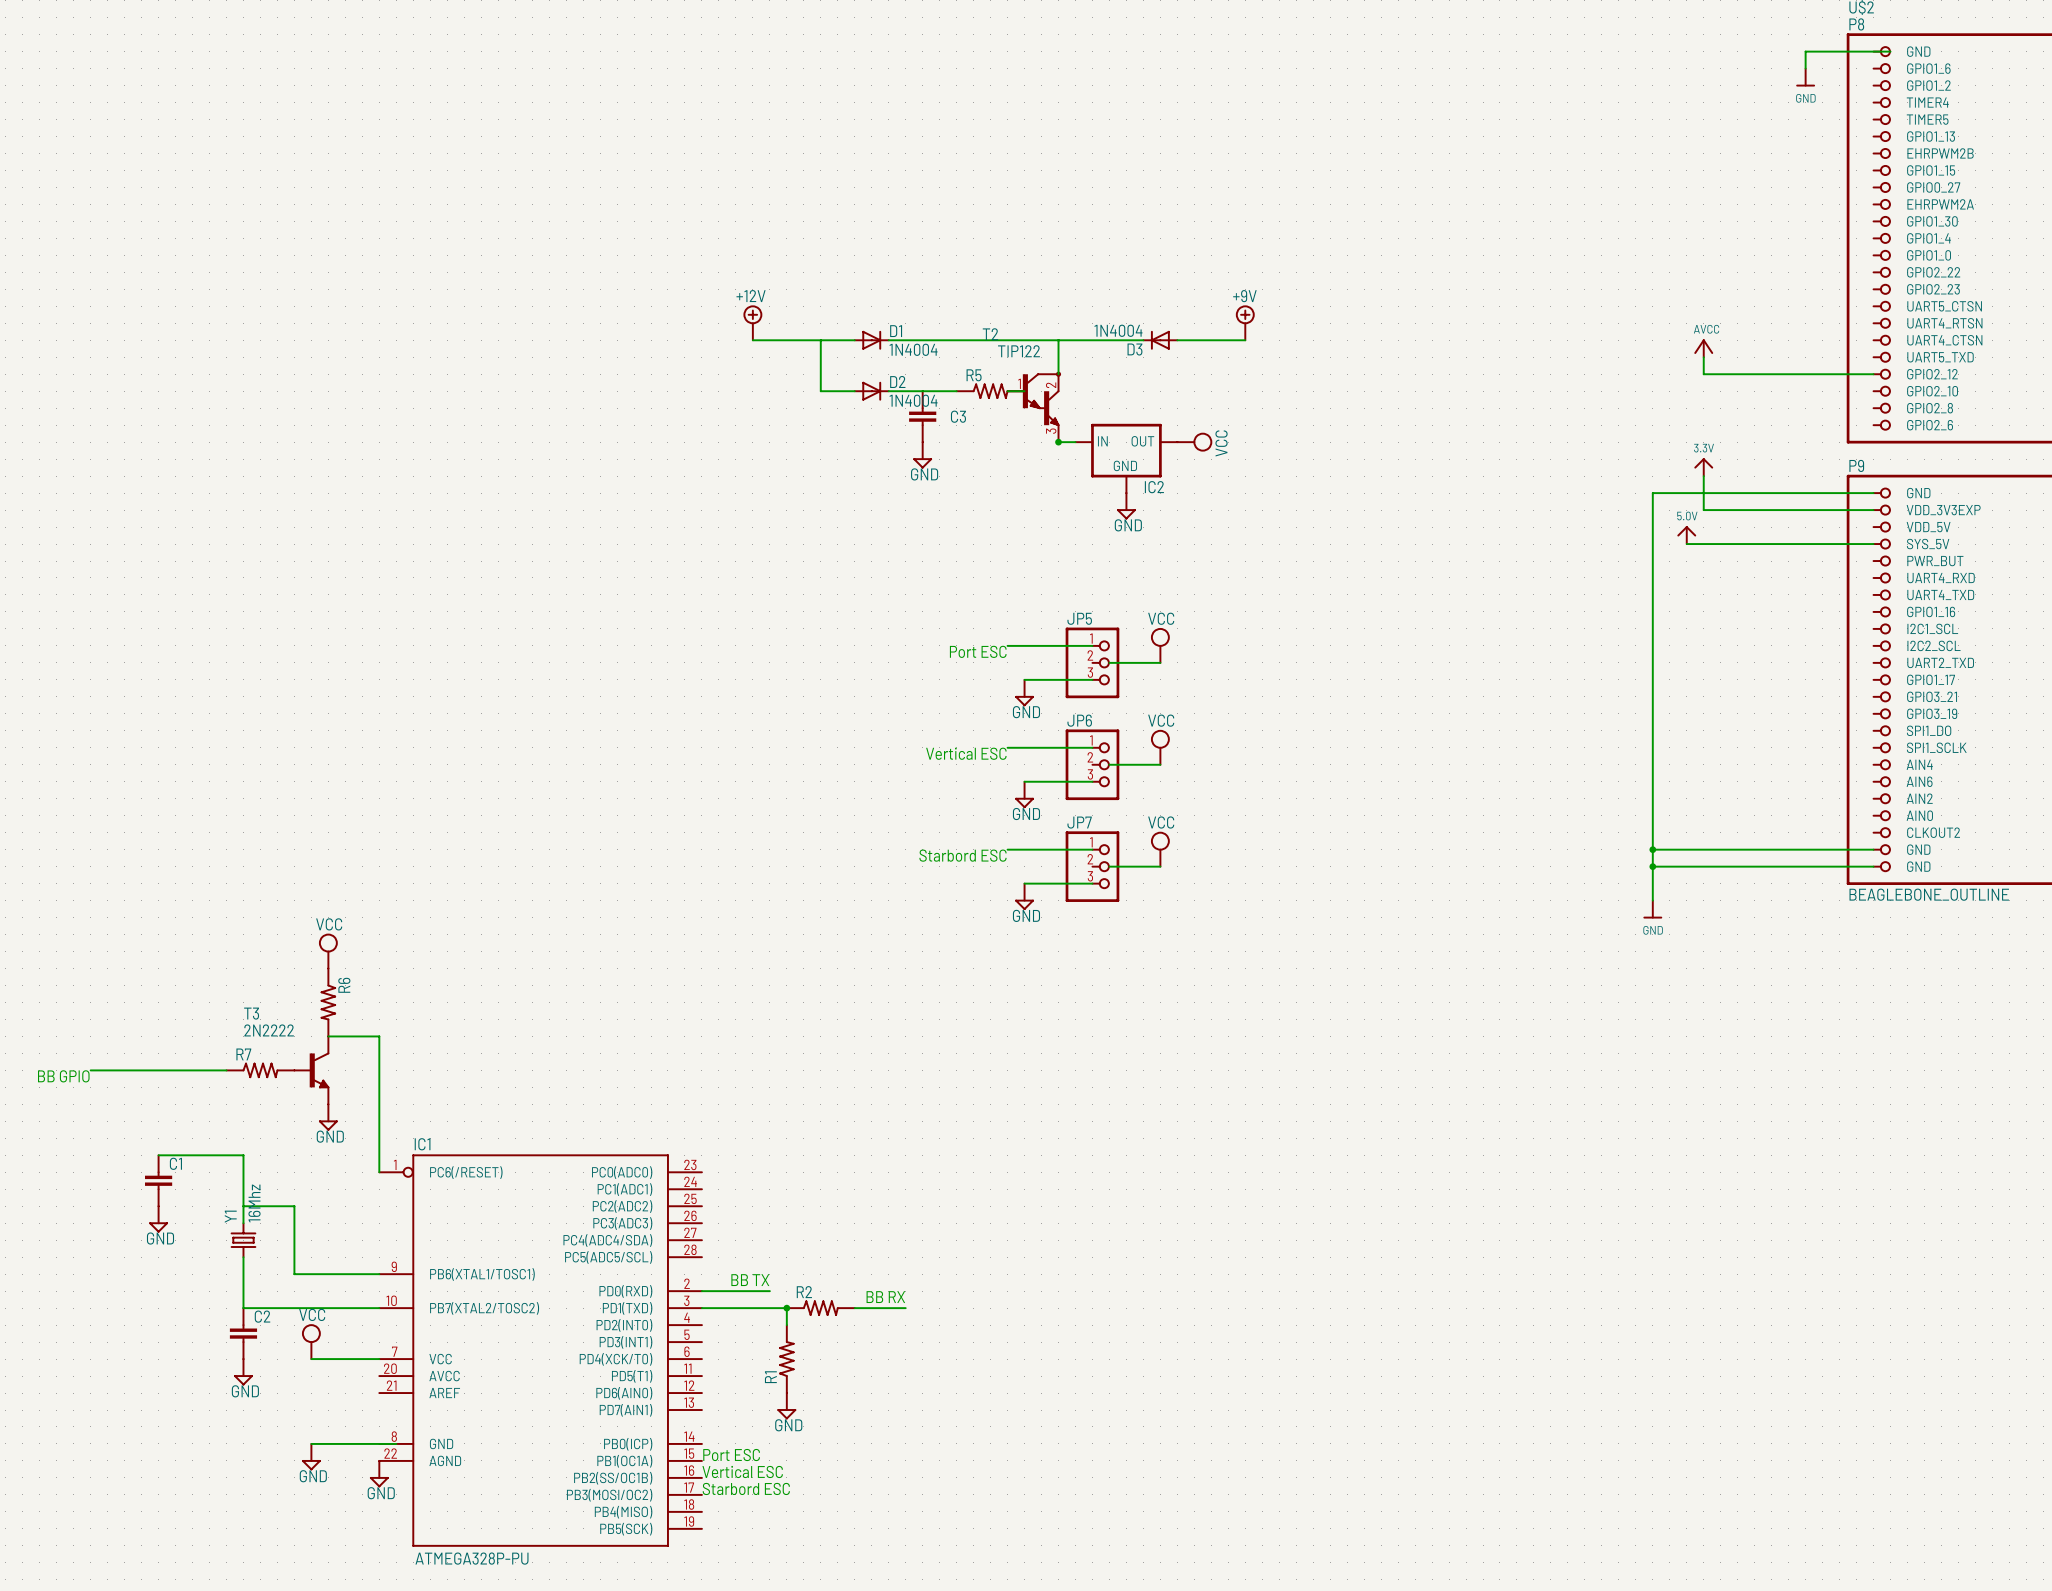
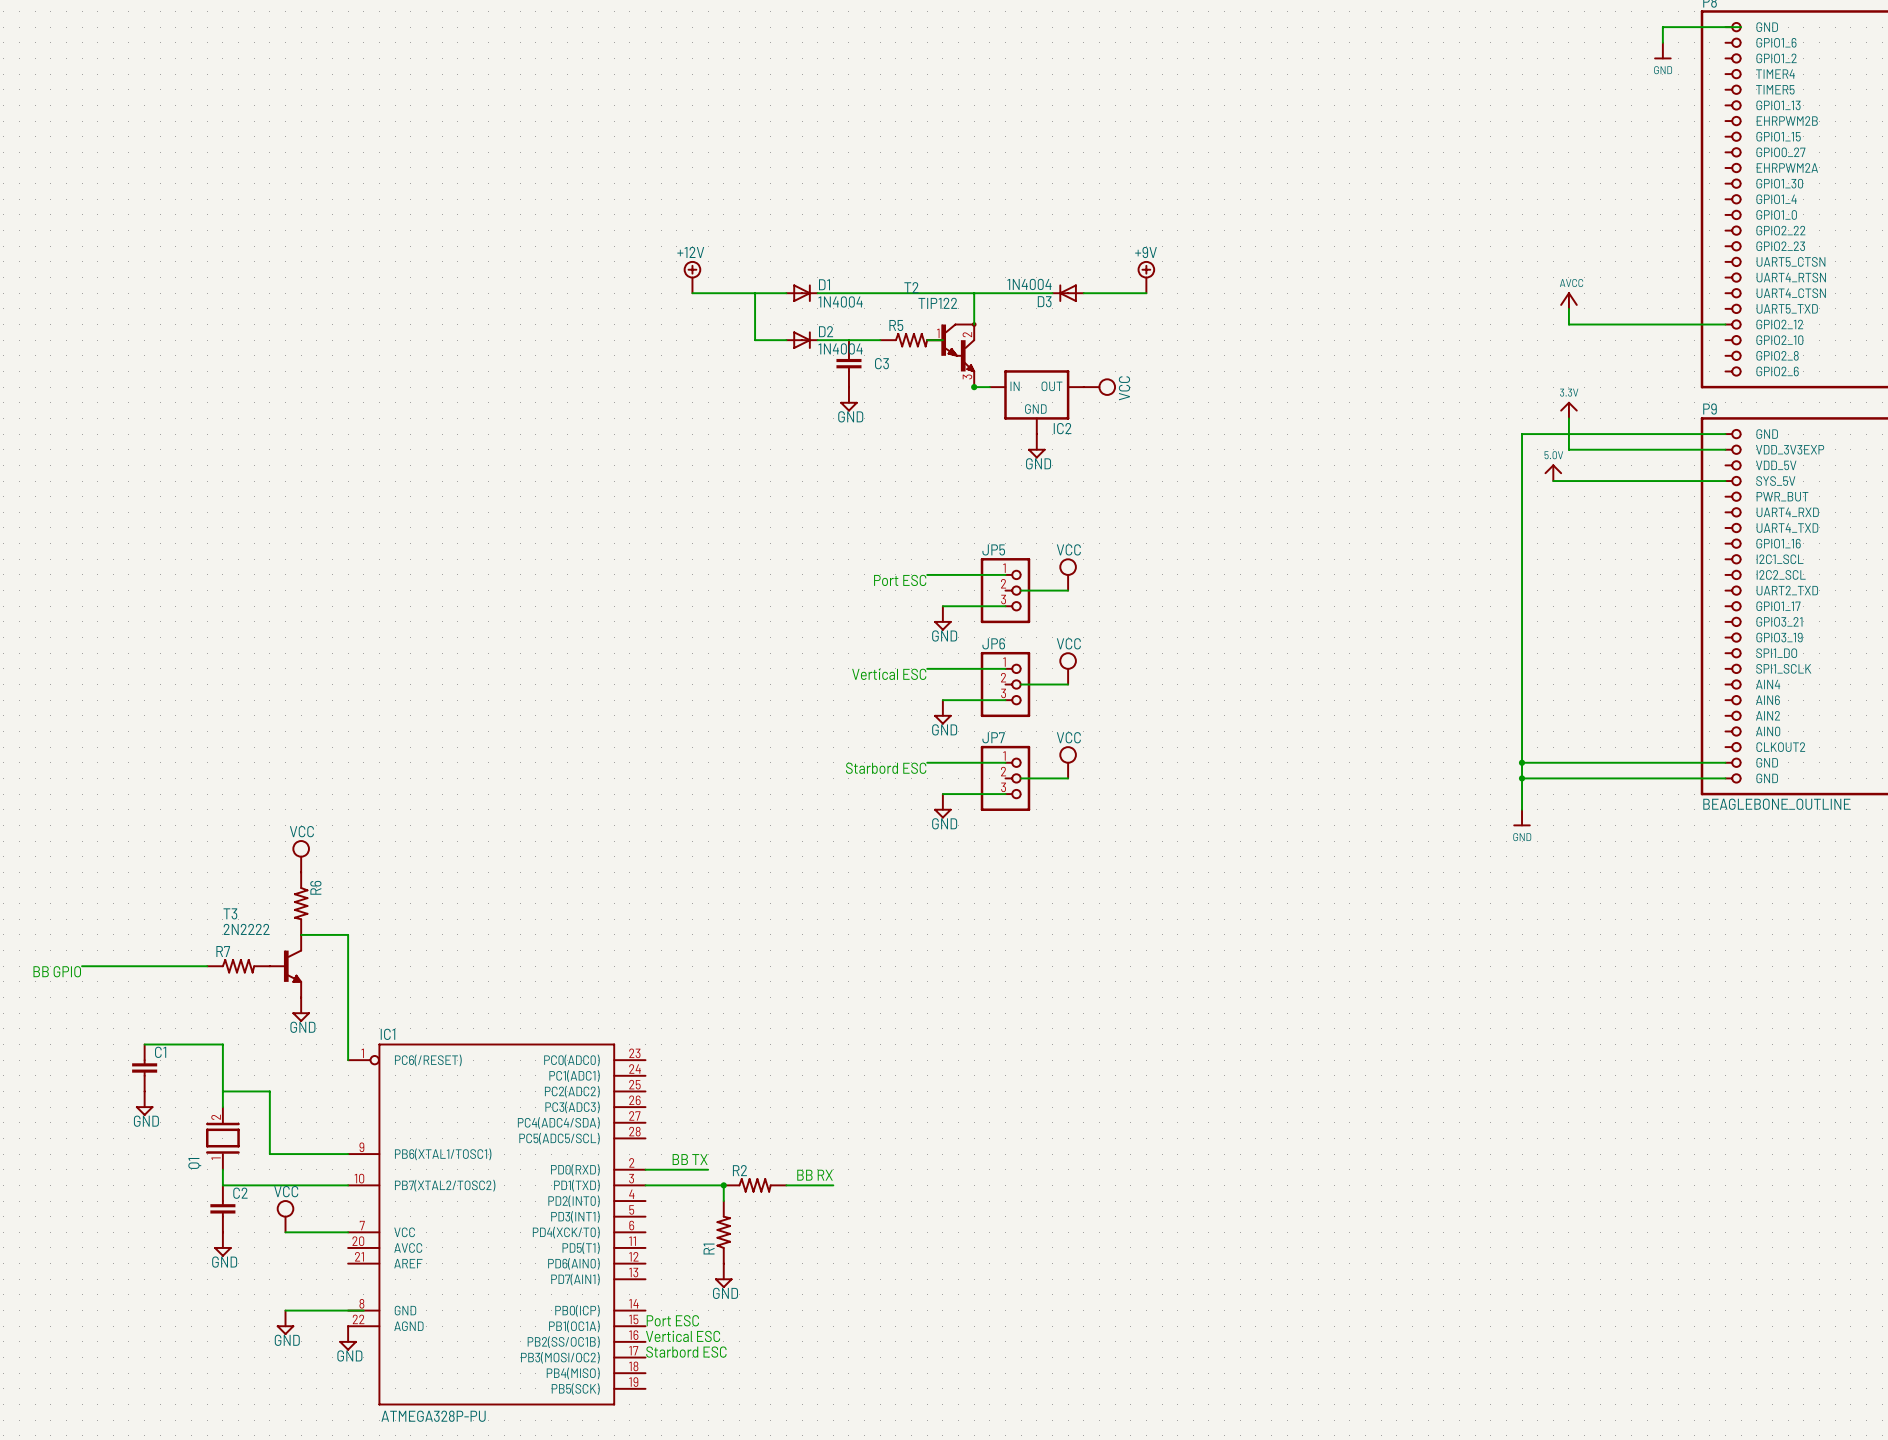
Y1: 16Mhz (243, 1240) -> none
Q1: none -> (222, 1138)

